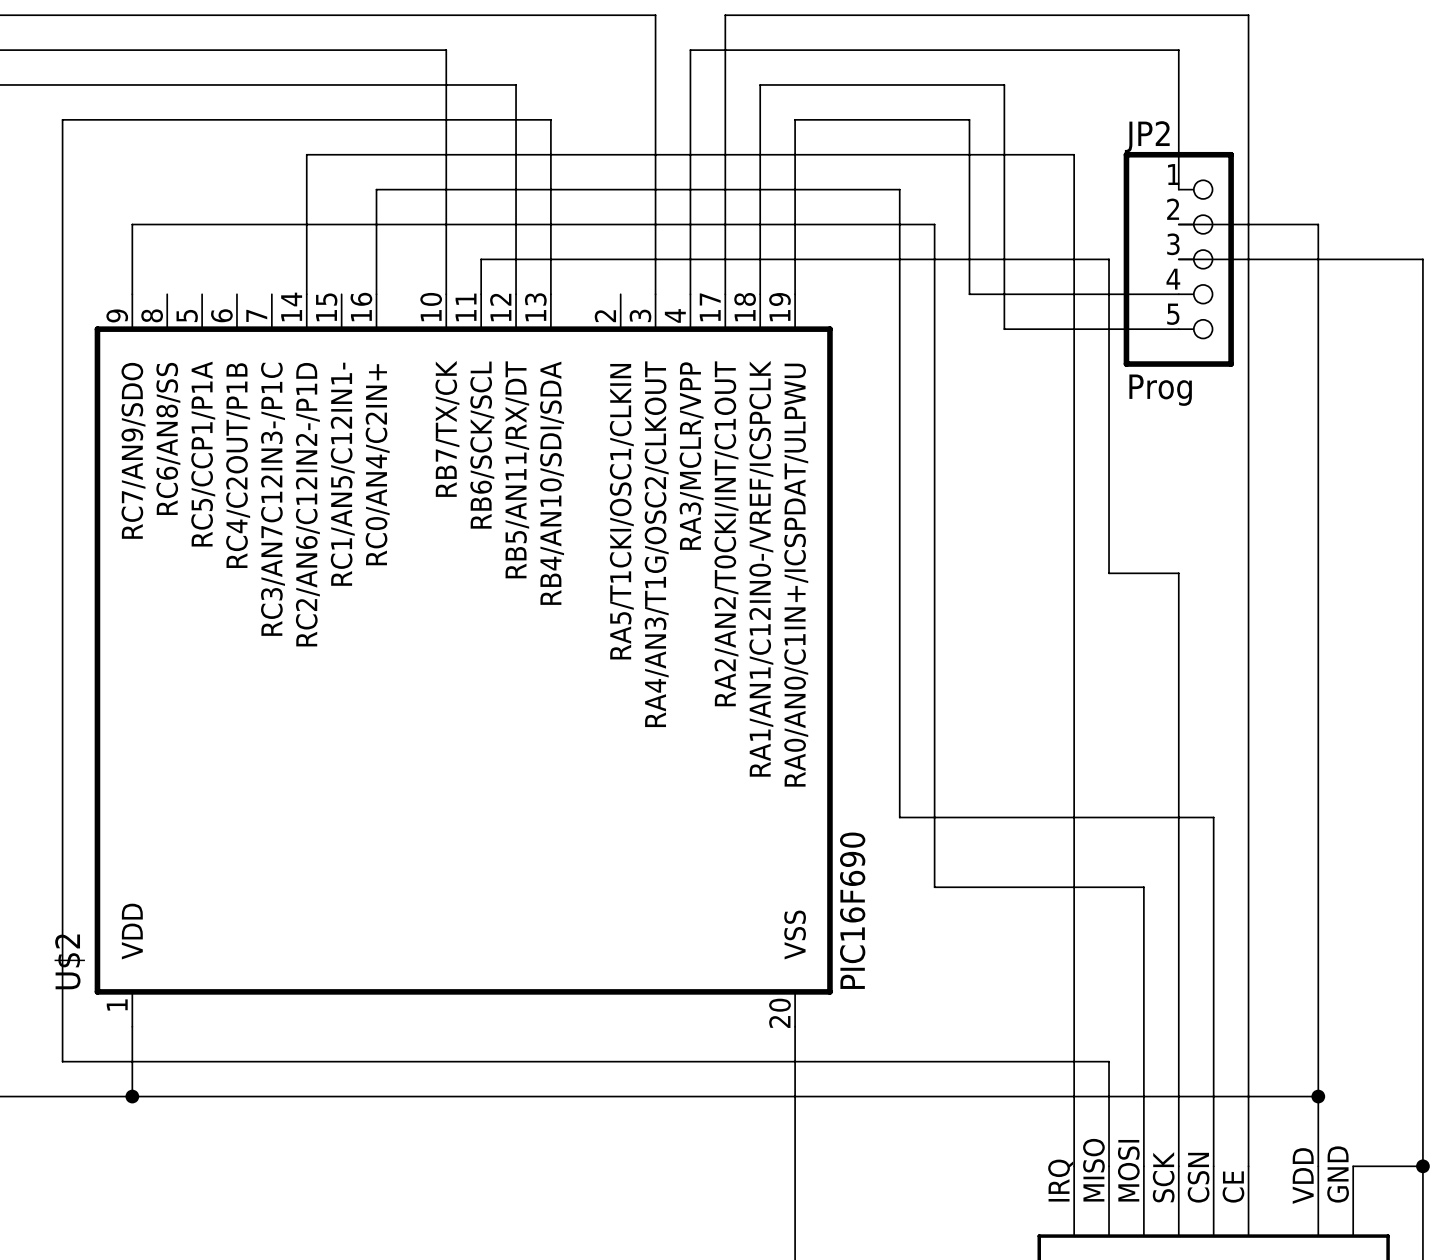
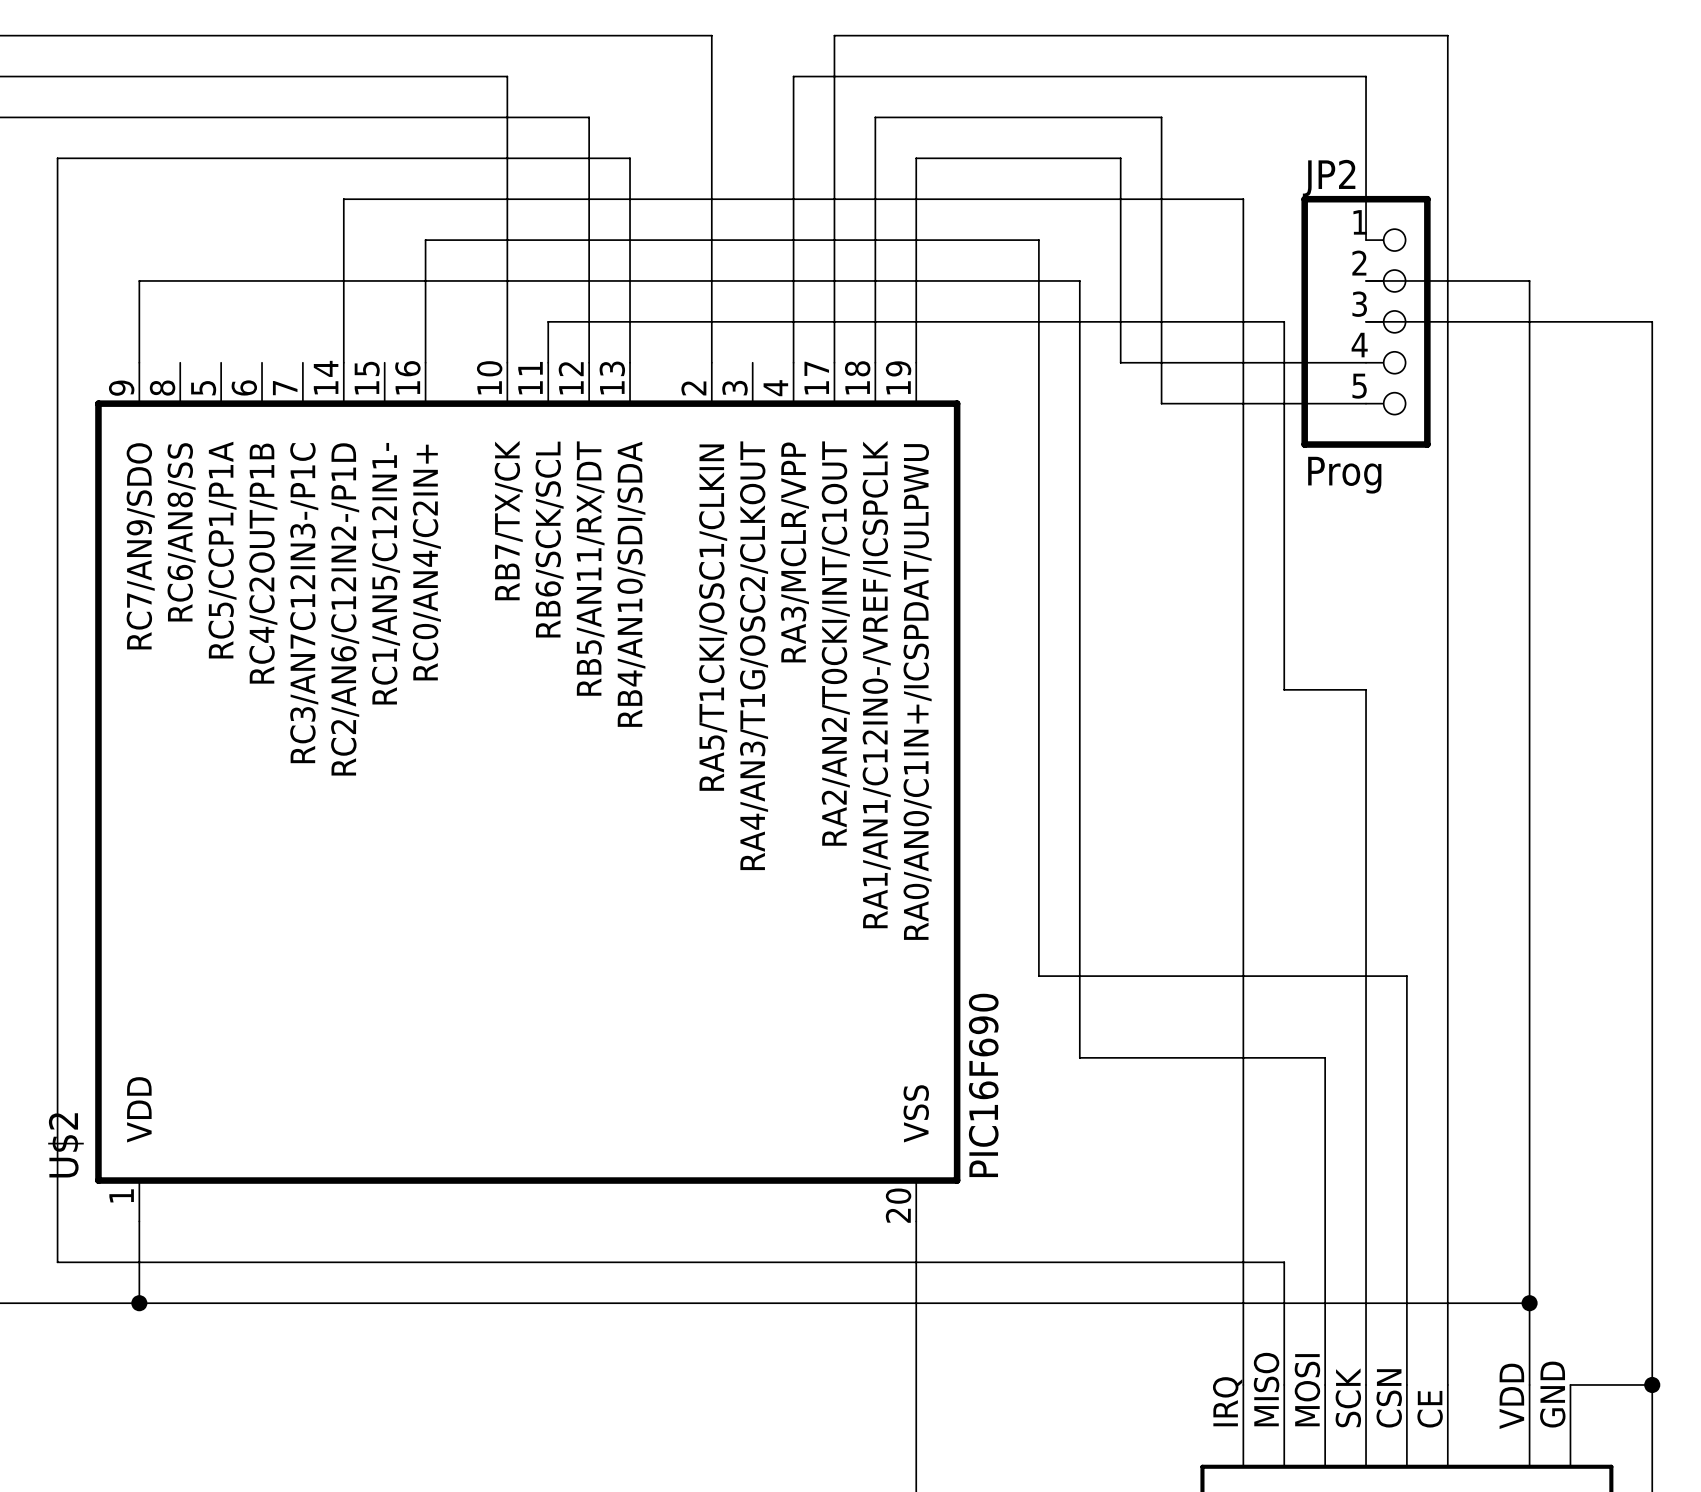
wire: (620, 15) (655, 15) (655, 294) -> (711, 35) (711, 362)

